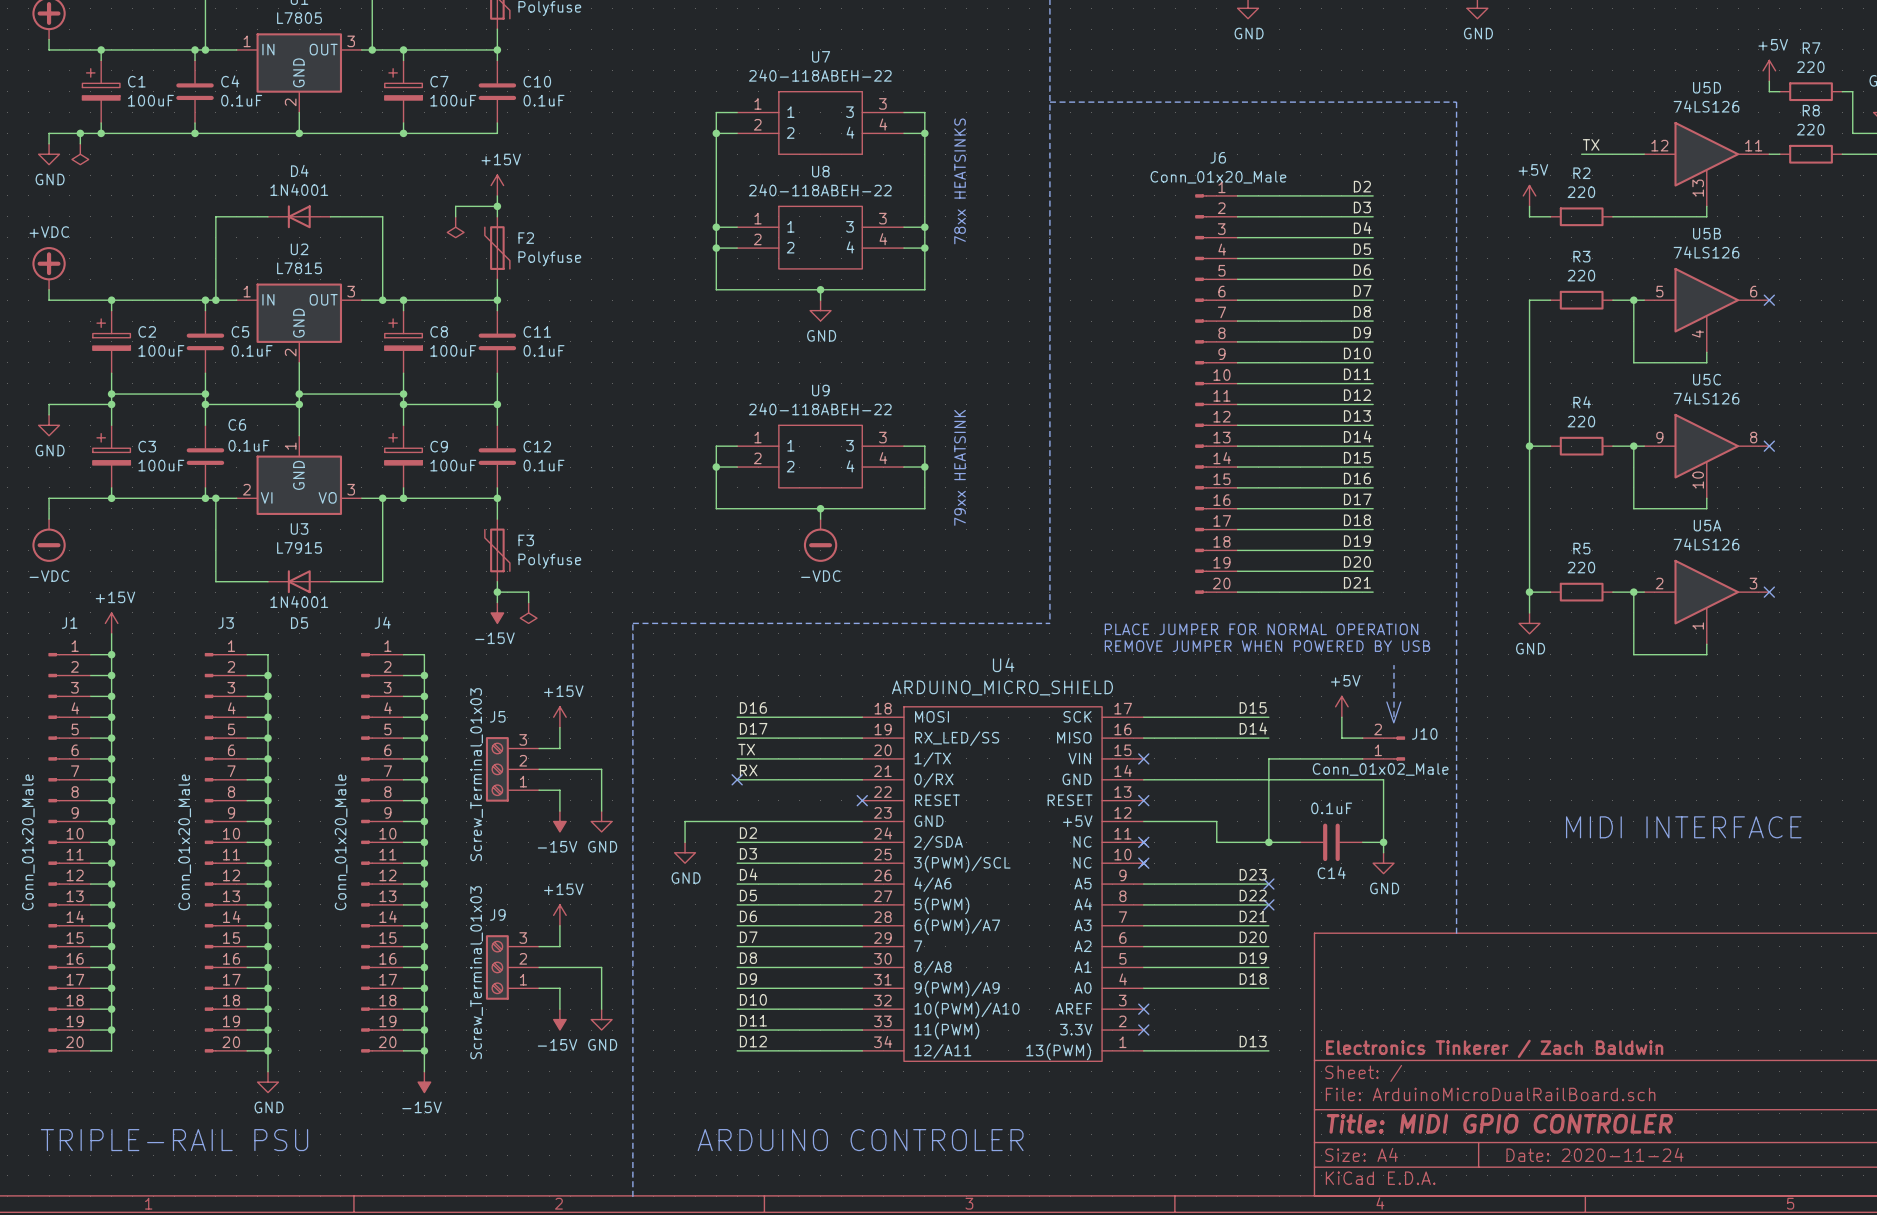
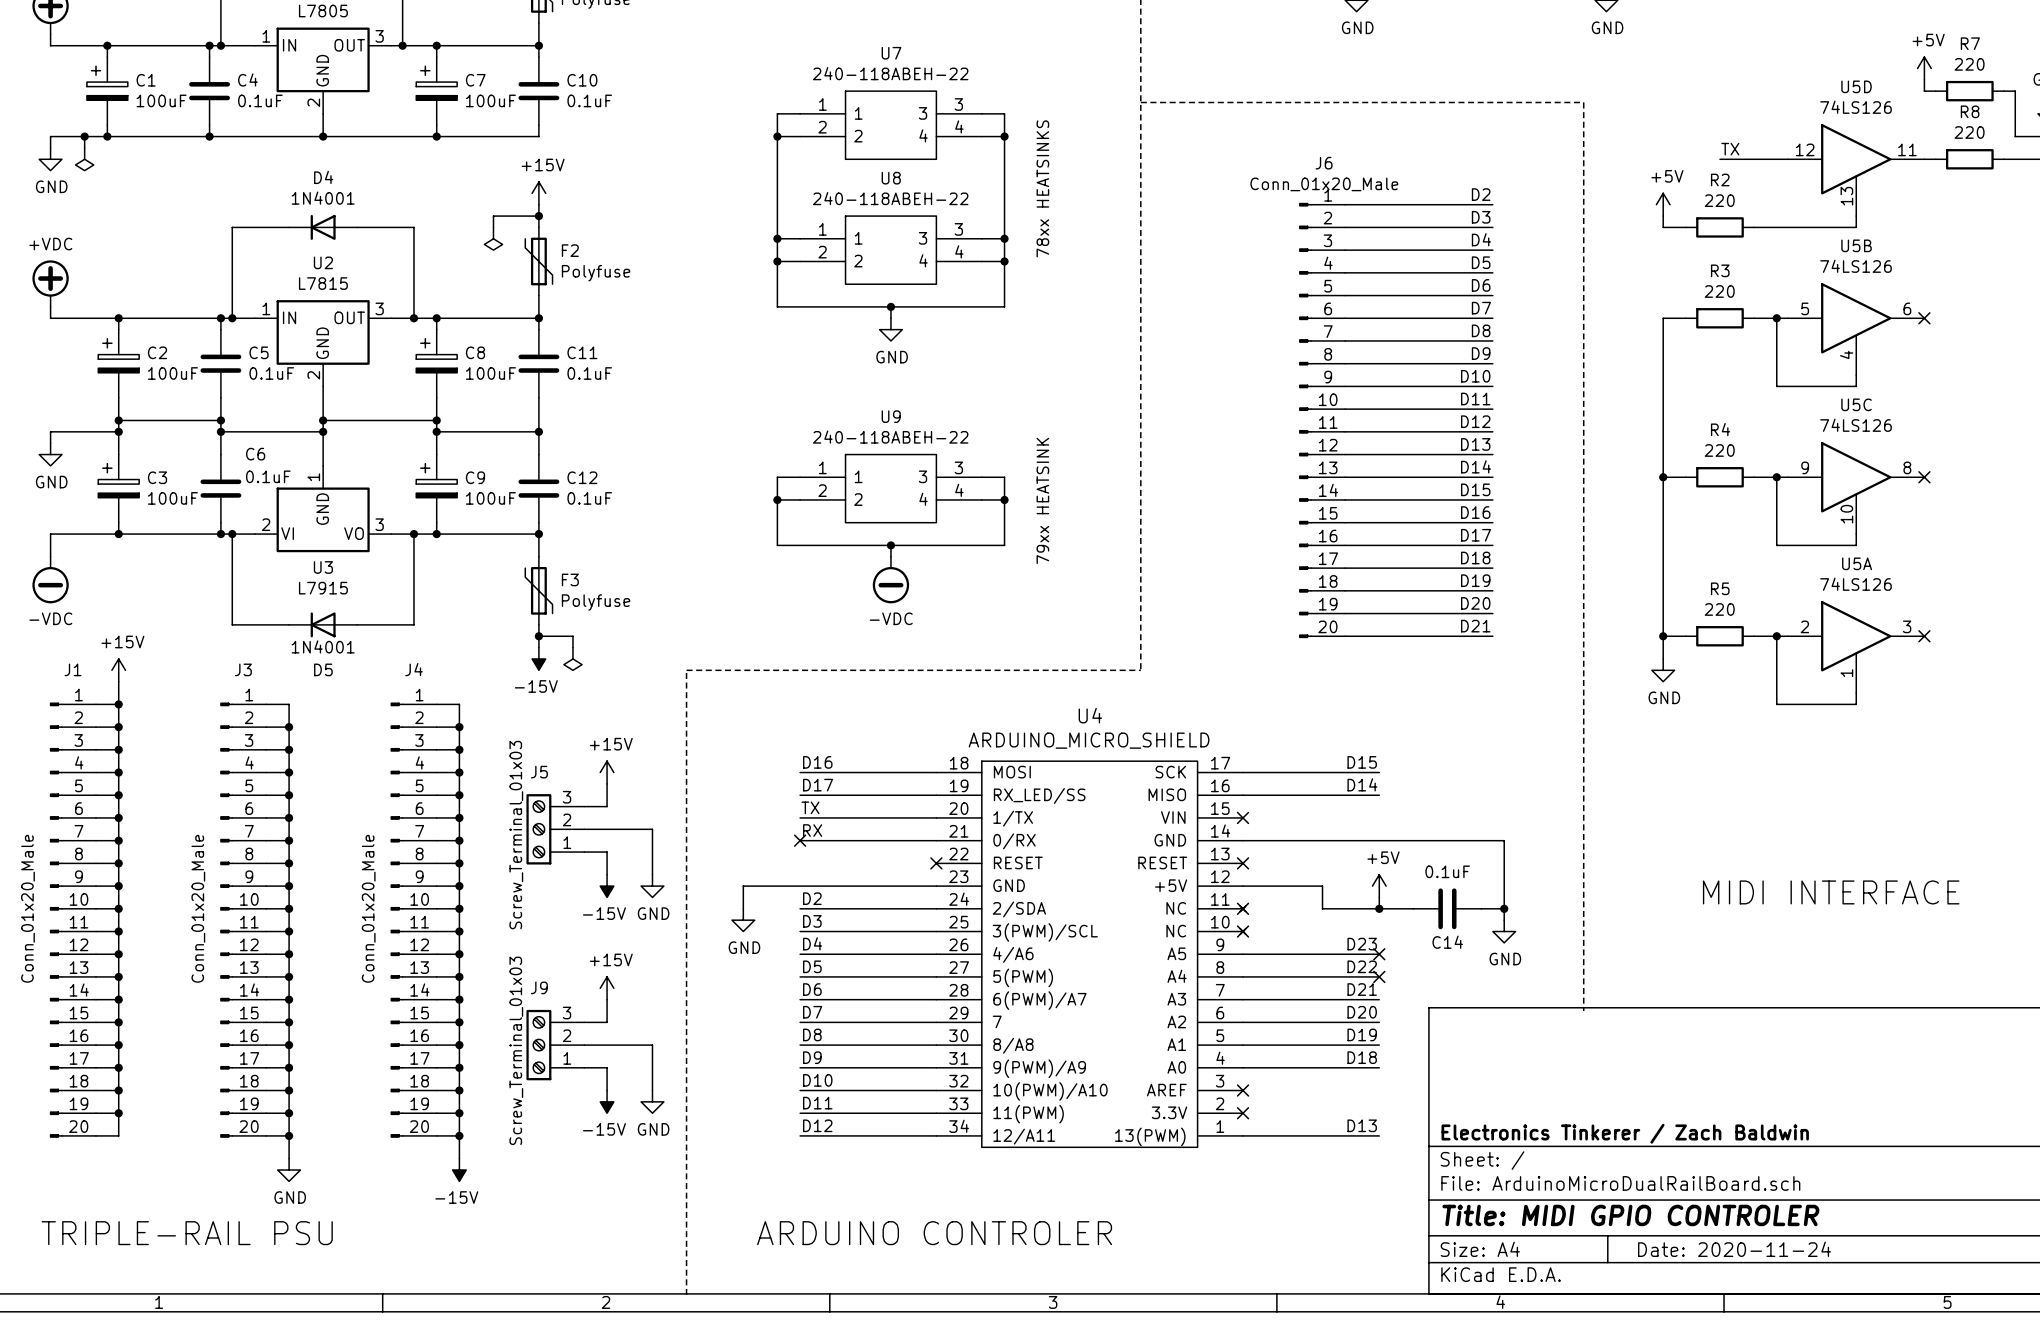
text: PLACE JUMPER FOR NORMAL OPERATION (1261, 629) -> none
text: REMOVE JUMPER WHEN POWERED BY USB (1267, 646) -> none
line: (1393, 665) (1393, 717) -> none
power symbol position: +5V (1341, 706) -> +5V (1379, 886)
text: V (1393, 712) -> none
wire: (1341, 717) (1341, 738) (1362, 738) -> none
J10: Conn_01x02_Male (1383, 748) -> none
wire: (1362, 758) (1268, 758) (1268, 831) -> none

